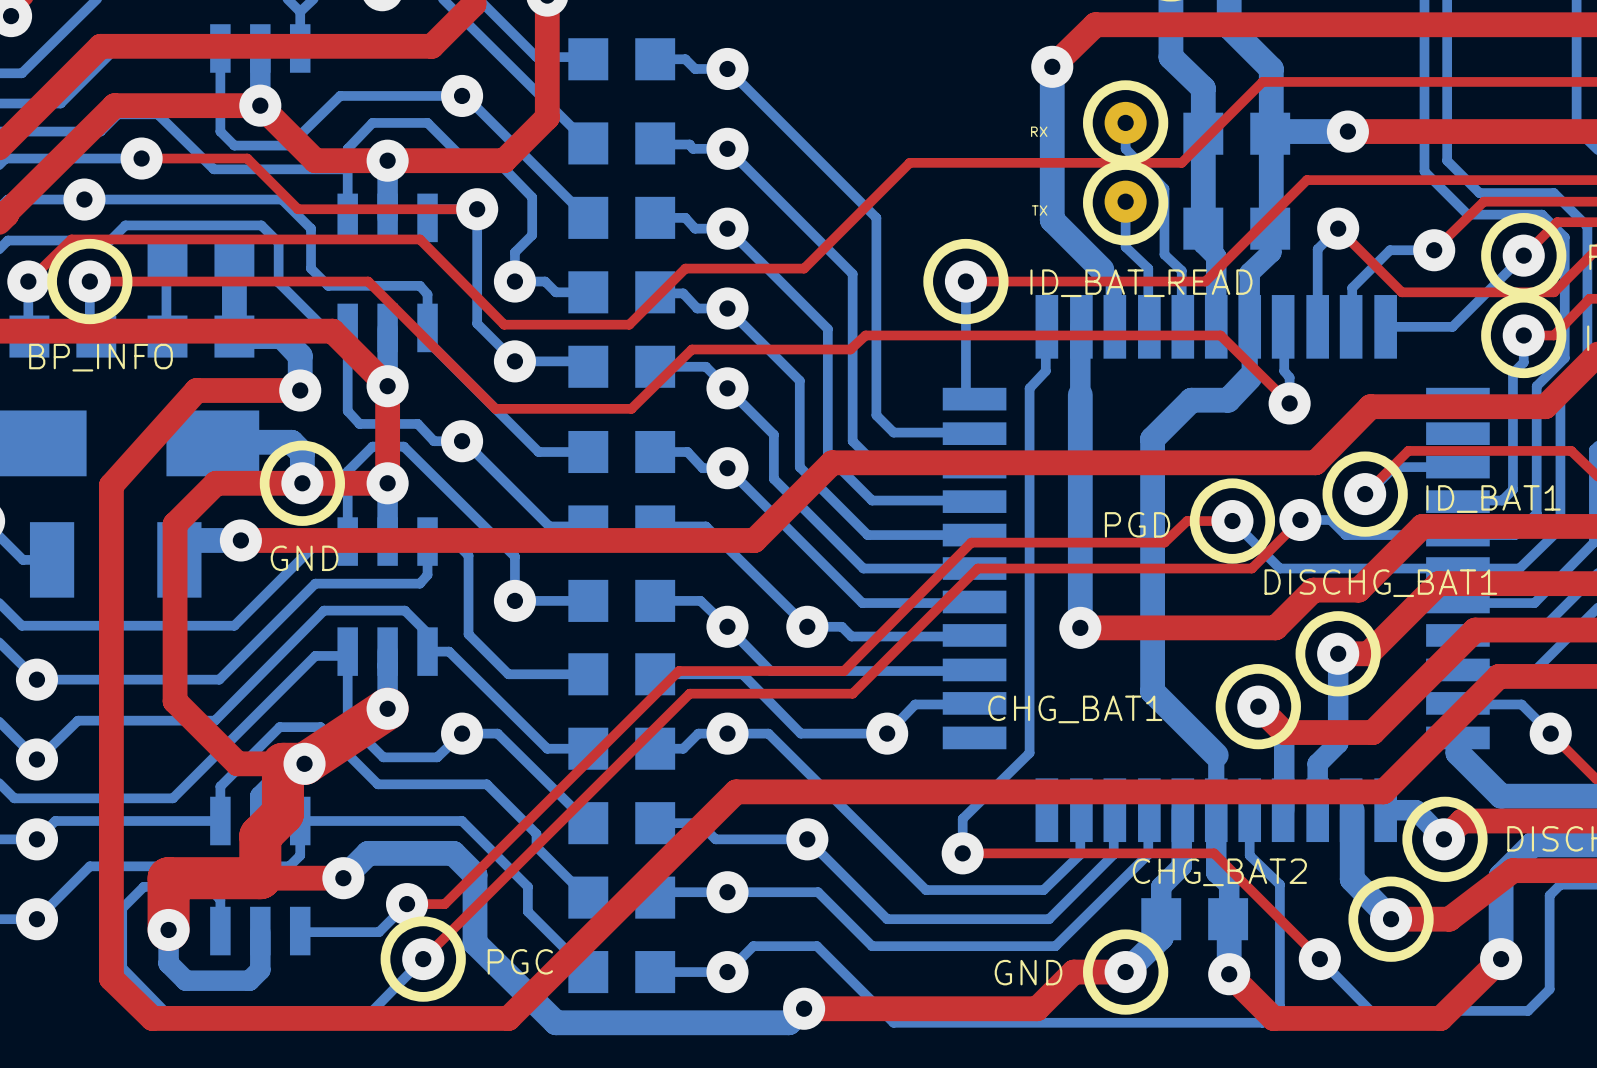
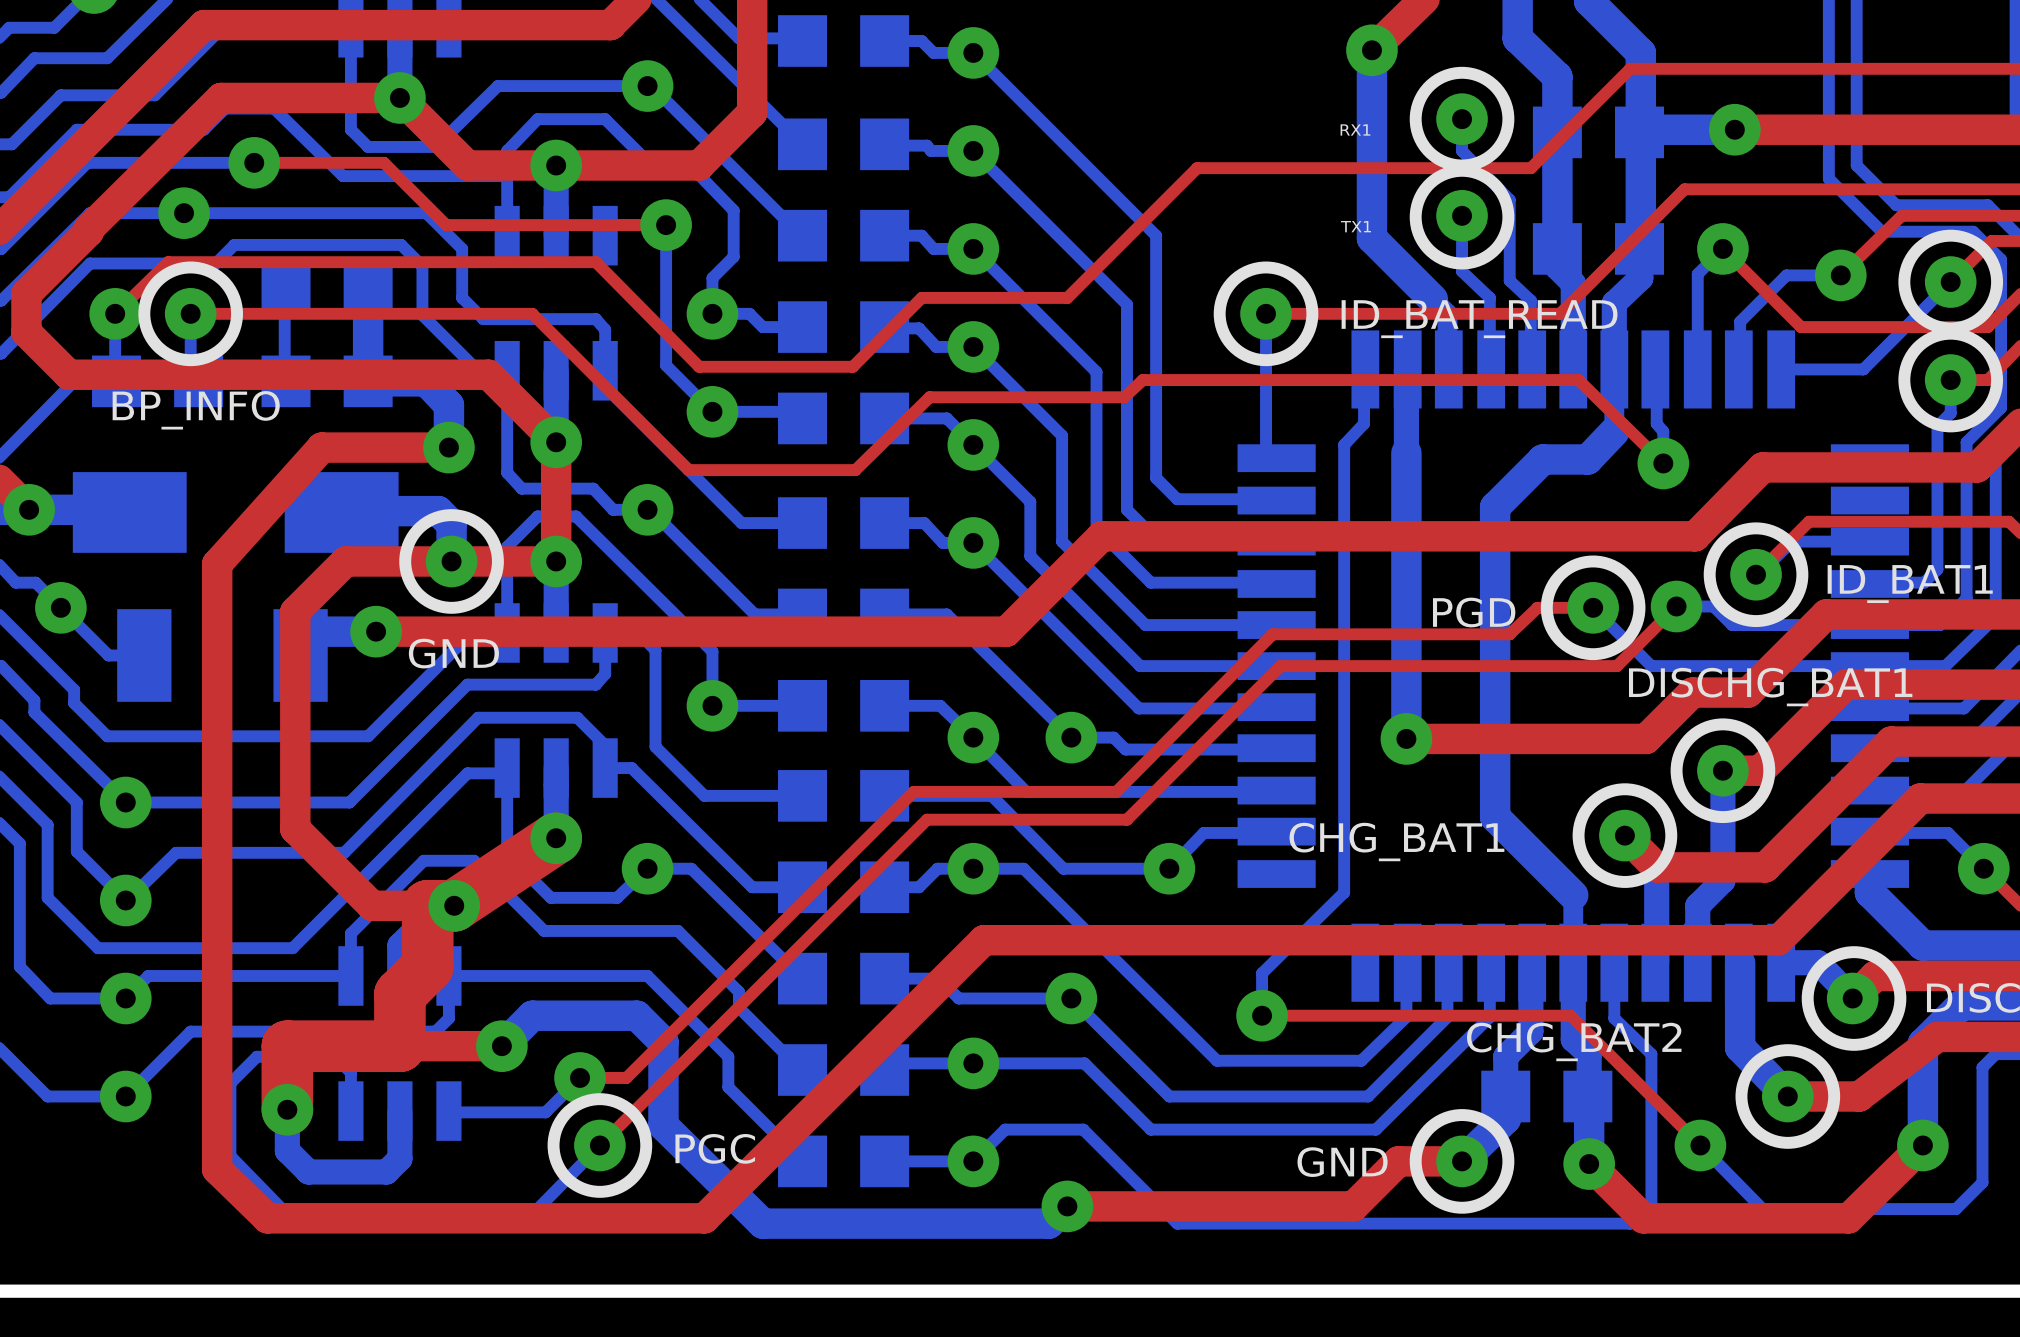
RX name: RX (1039, 131) -> RX1 (1355, 129)
TX name: TX (1039, 210) -> TX1 (1355, 226)

